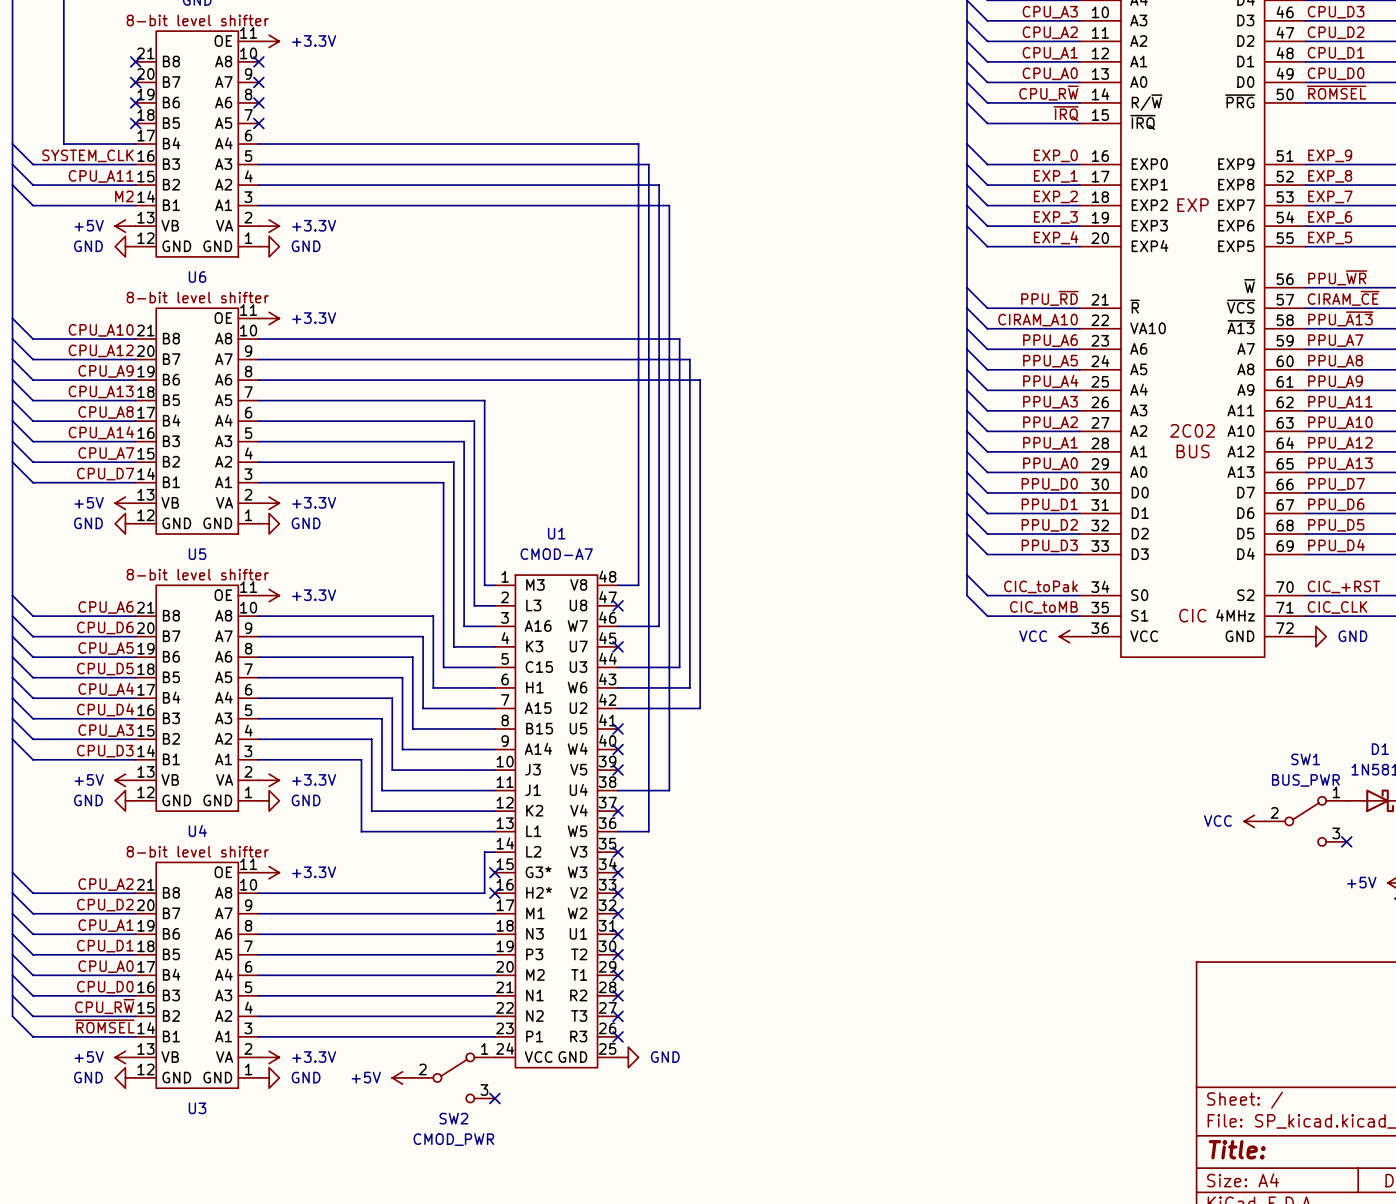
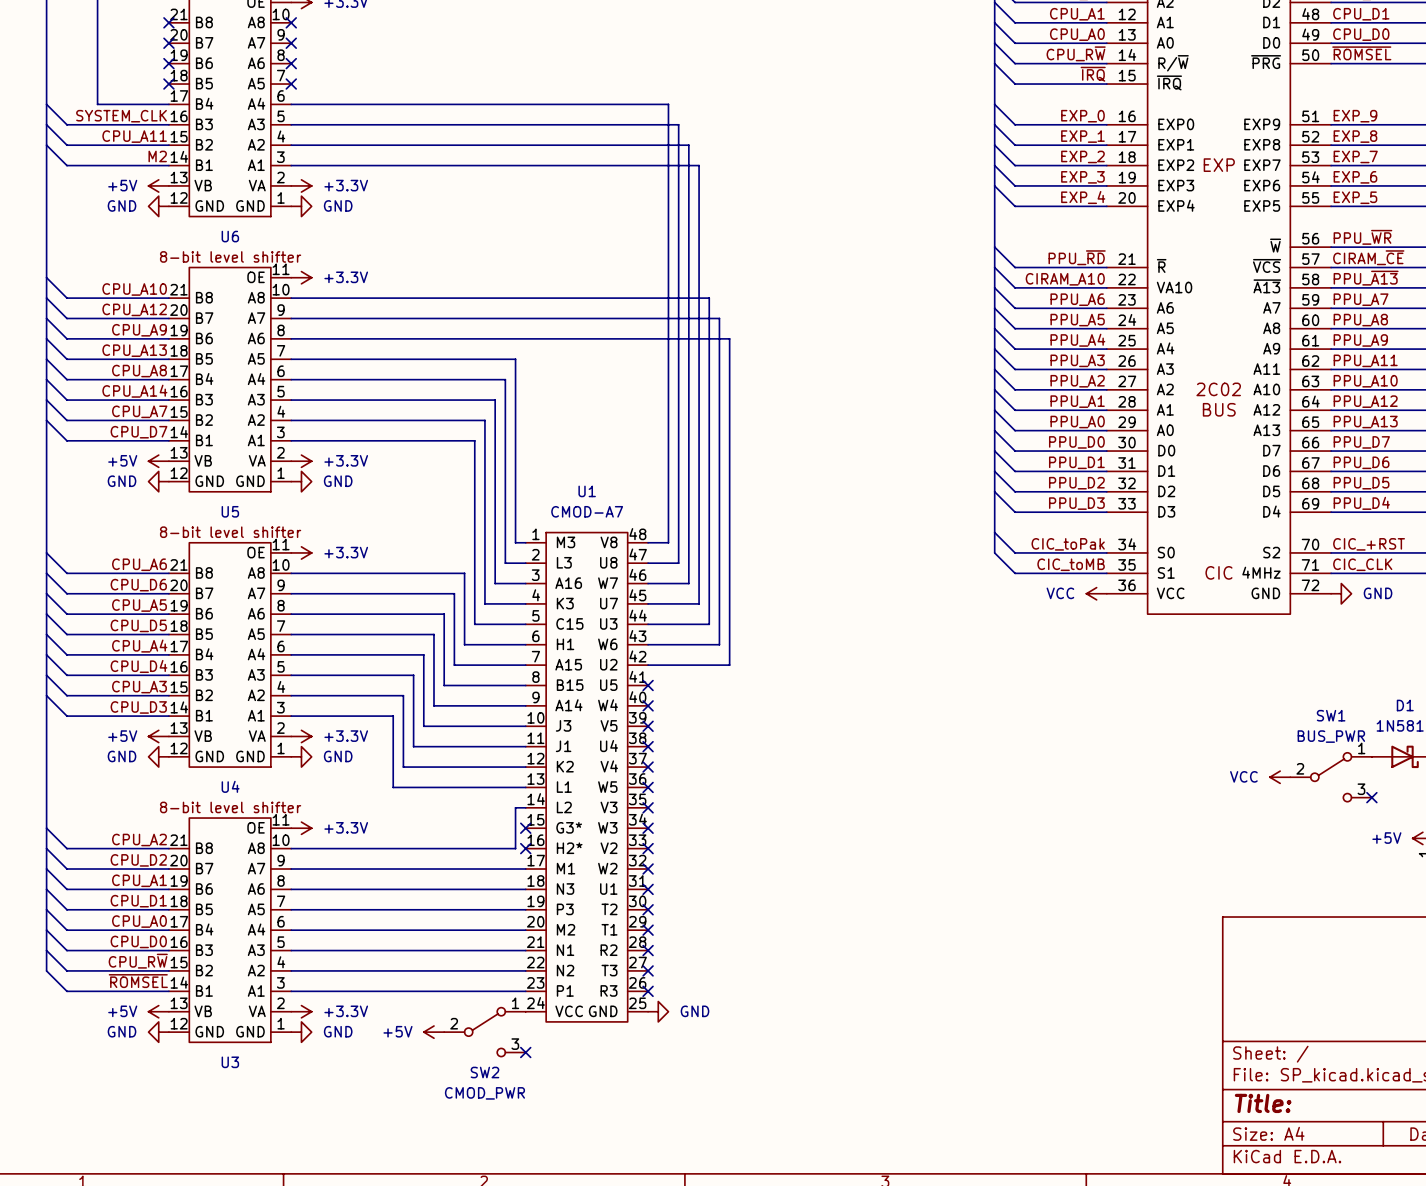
no-connect mark: (618, 605) -> none
wire: (648, 605) (648, 831) (618, 831) -> (678, 563) (648, 563)
no-connect mark: (618, 646) -> none
wire: (669, 646) (669, 790) (618, 790) -> (699, 603) (648, 603)
no-connect mark: none -> (648, 746)
no-connect mark: none -> (648, 787)

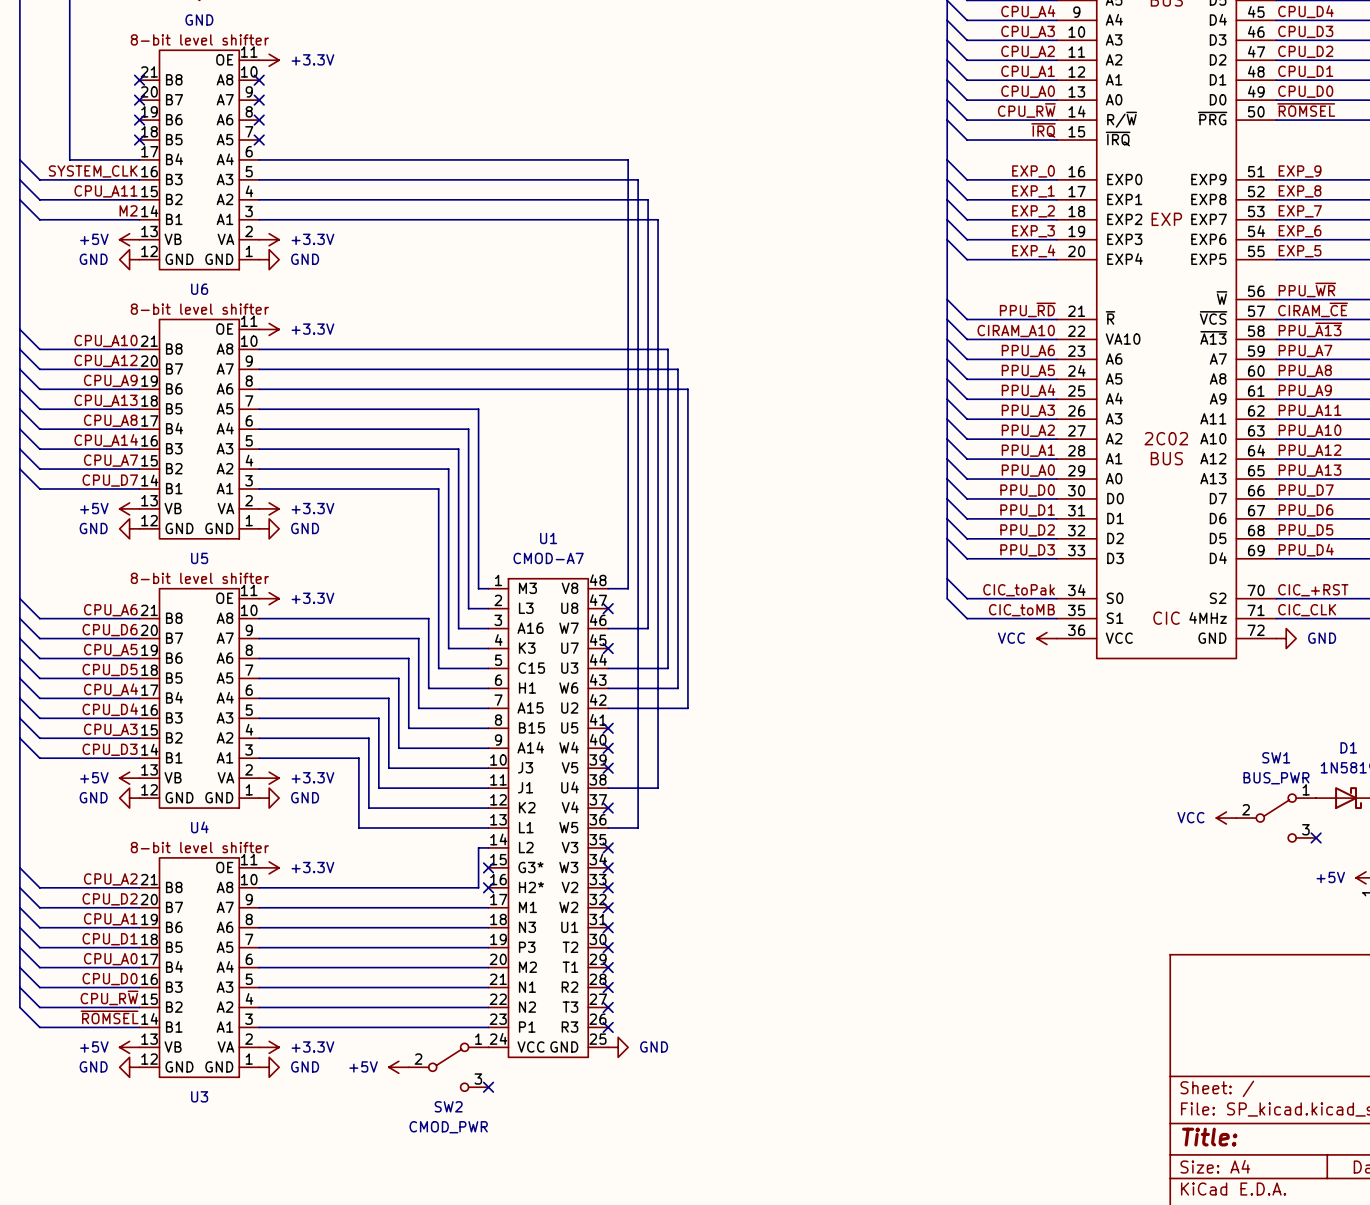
wire: (648, 563) (678, 563) -> (608, 828) (638, 828) (638, 608)
no-connect mark: none -> (608, 608)
wire: (648, 603) (699, 603) -> (608, 788) (658, 788) (658, 648)
no-connect mark: none -> (608, 648)
no-connect mark: (648, 746) -> none
no-connect mark: (648, 787) -> none

